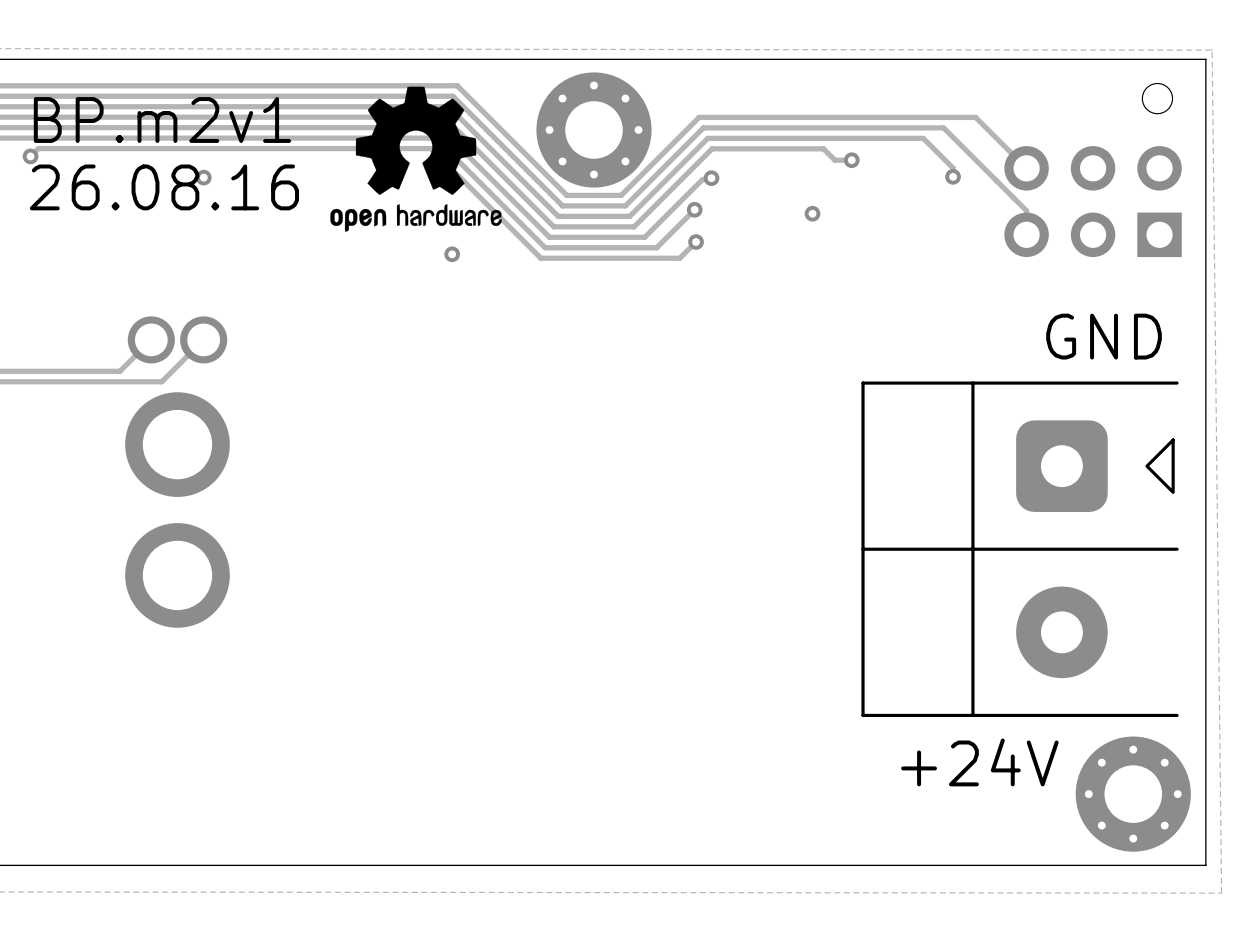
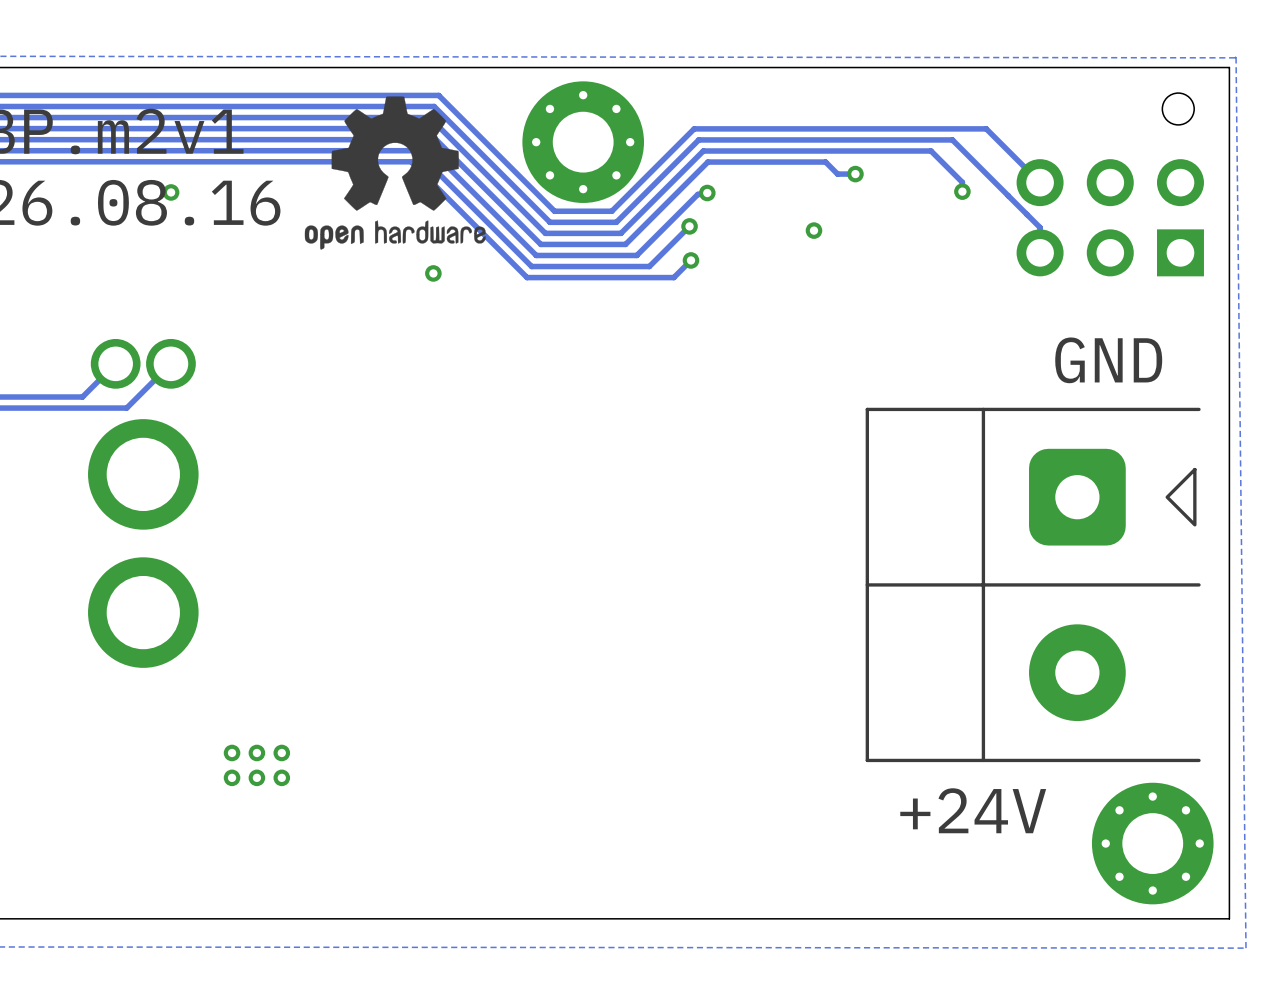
via: none -> (232, 752)
via: none -> (256, 752)
via: none -> (281, 752)
via: none -> (232, 777)
via: none -> (256, 777)
via: none -> (281, 777)

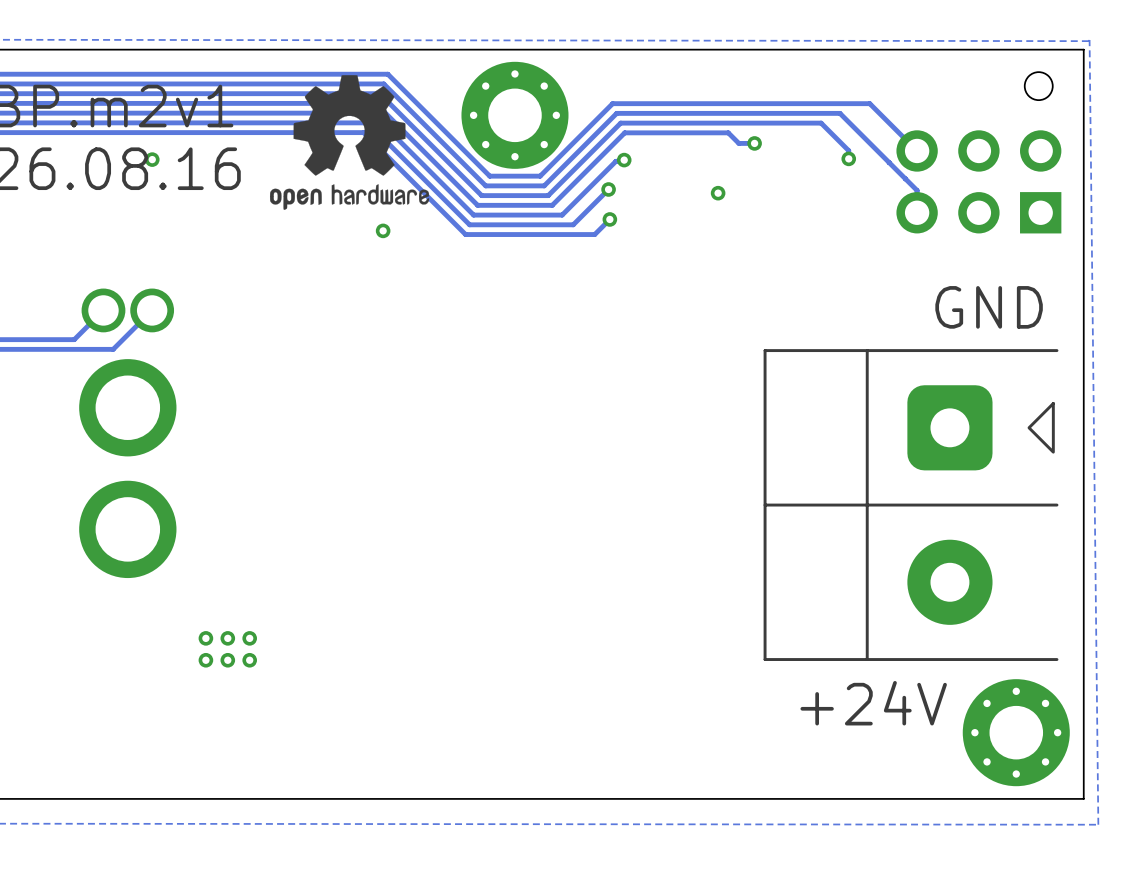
via: none -> (205, 638)
via: none -> (227, 638)
via: none -> (249, 638)
via: (232, 752) -> none
via: (256, 752) -> none
via: (281, 752) -> none
via: none -> (205, 660)
via: none -> (227, 660)
via: none -> (249, 660)
via: (232, 777) -> none
via: (256, 777) -> none
via: (281, 777) -> none

